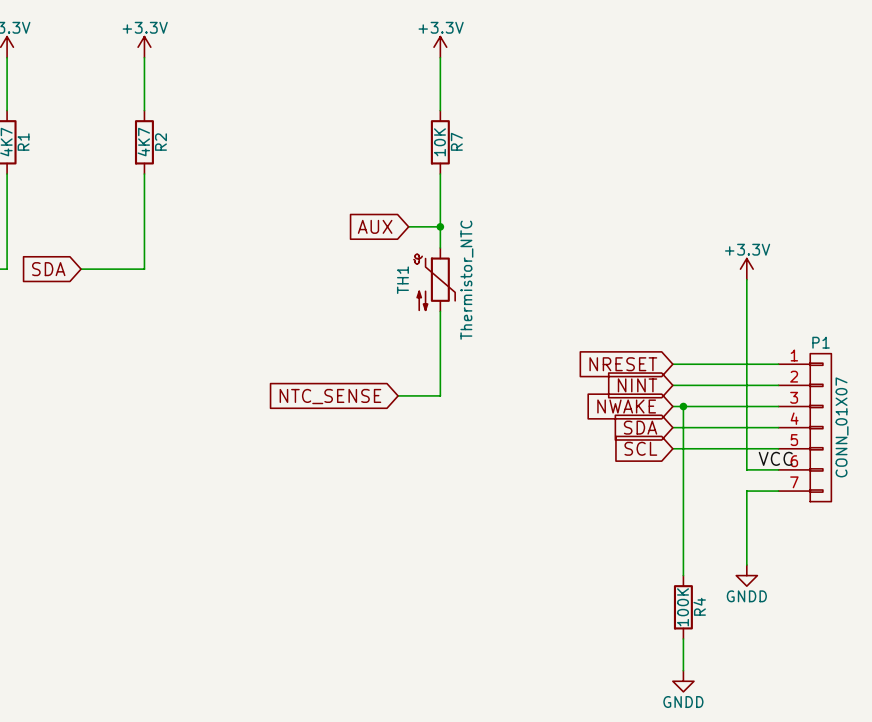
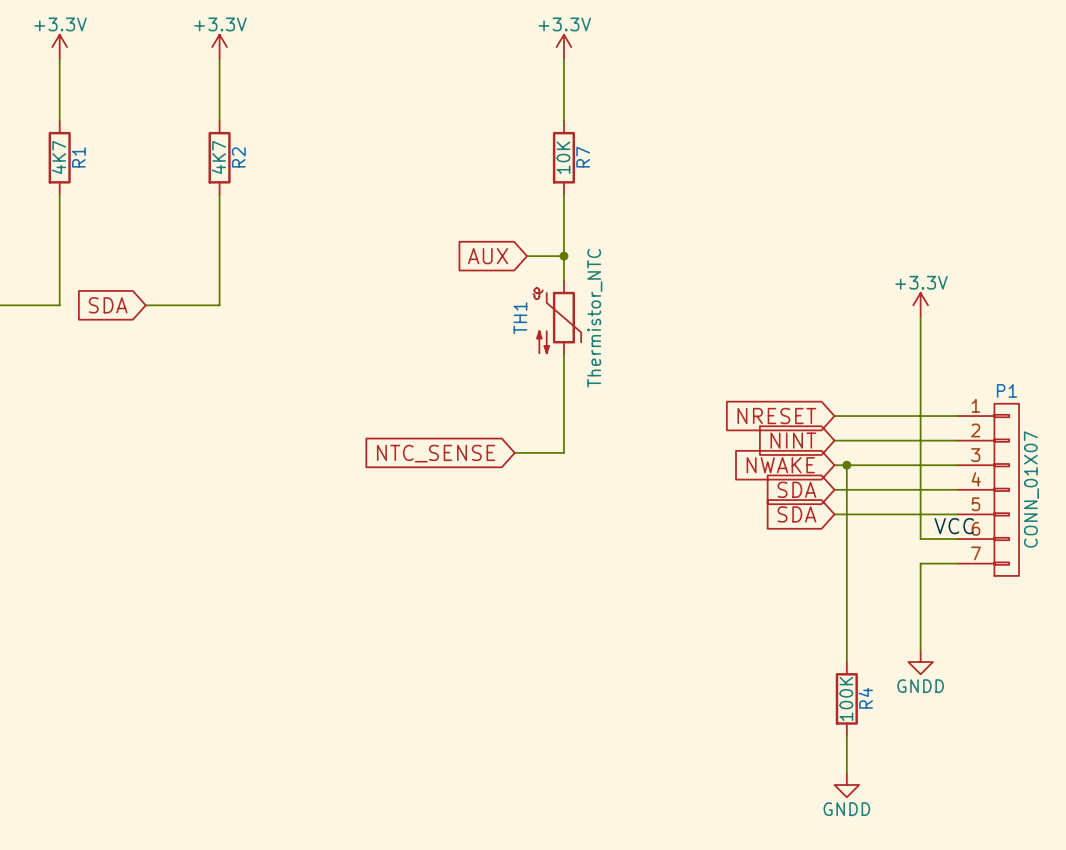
global label: SCL (640, 448) -> SDA (796, 514)

